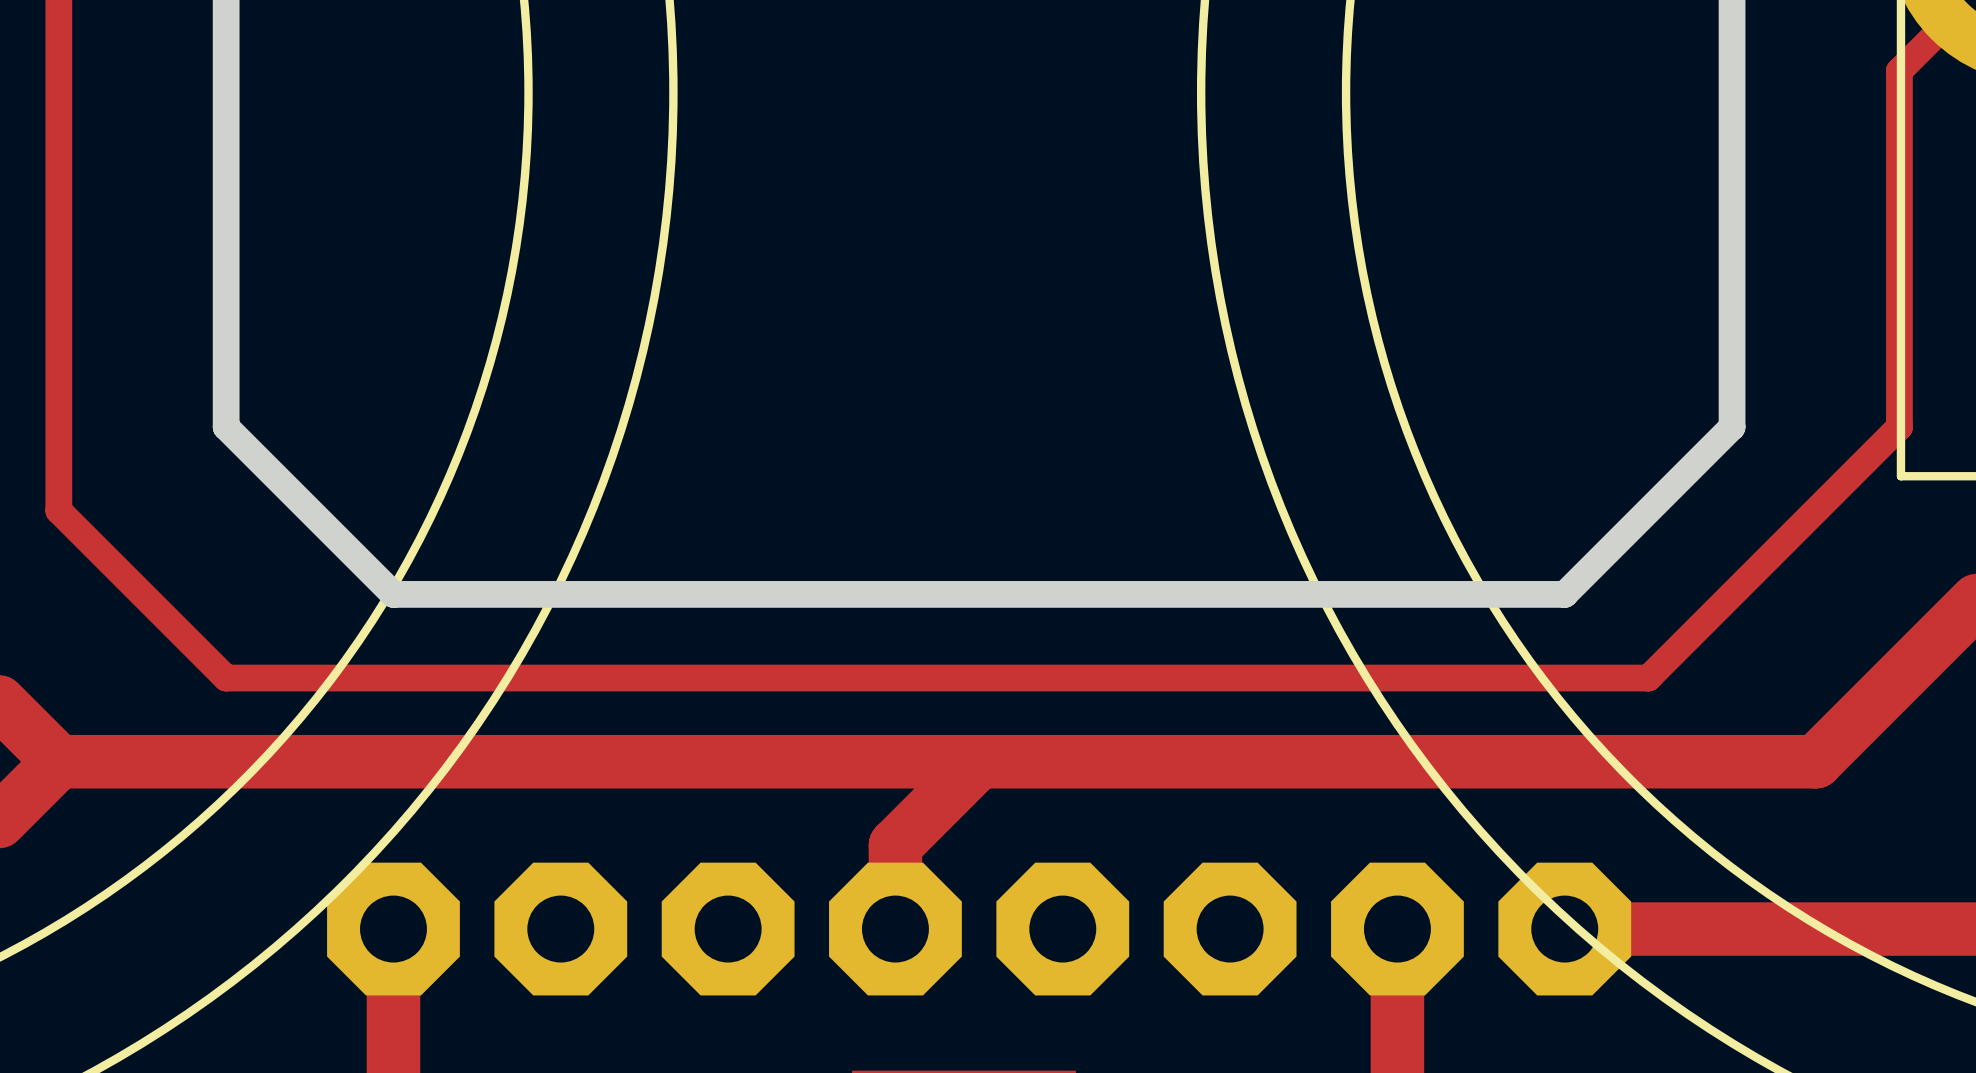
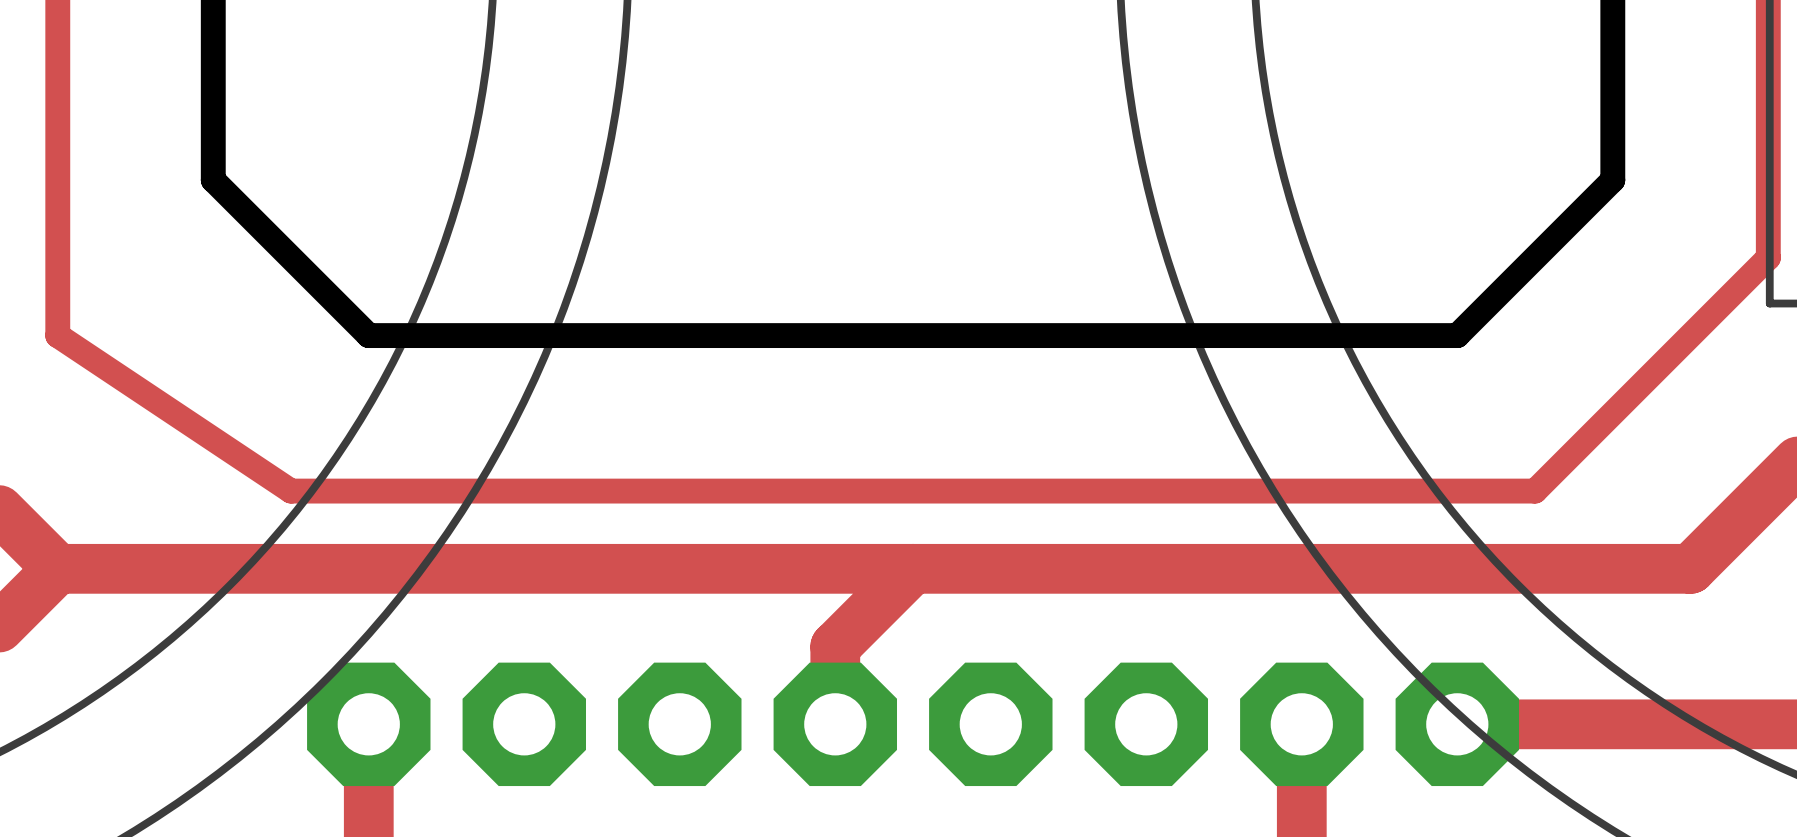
board edge: (226, 343) (226, 427) (393, 594) (1564, 594) (1732, 427) (1732, 343) -> (213, 180) (368, 335) (1457, 335) (1612, 180)
top track: (58, 510) (226, 678) (309, 678) -> (57, 335) (291, 491)

